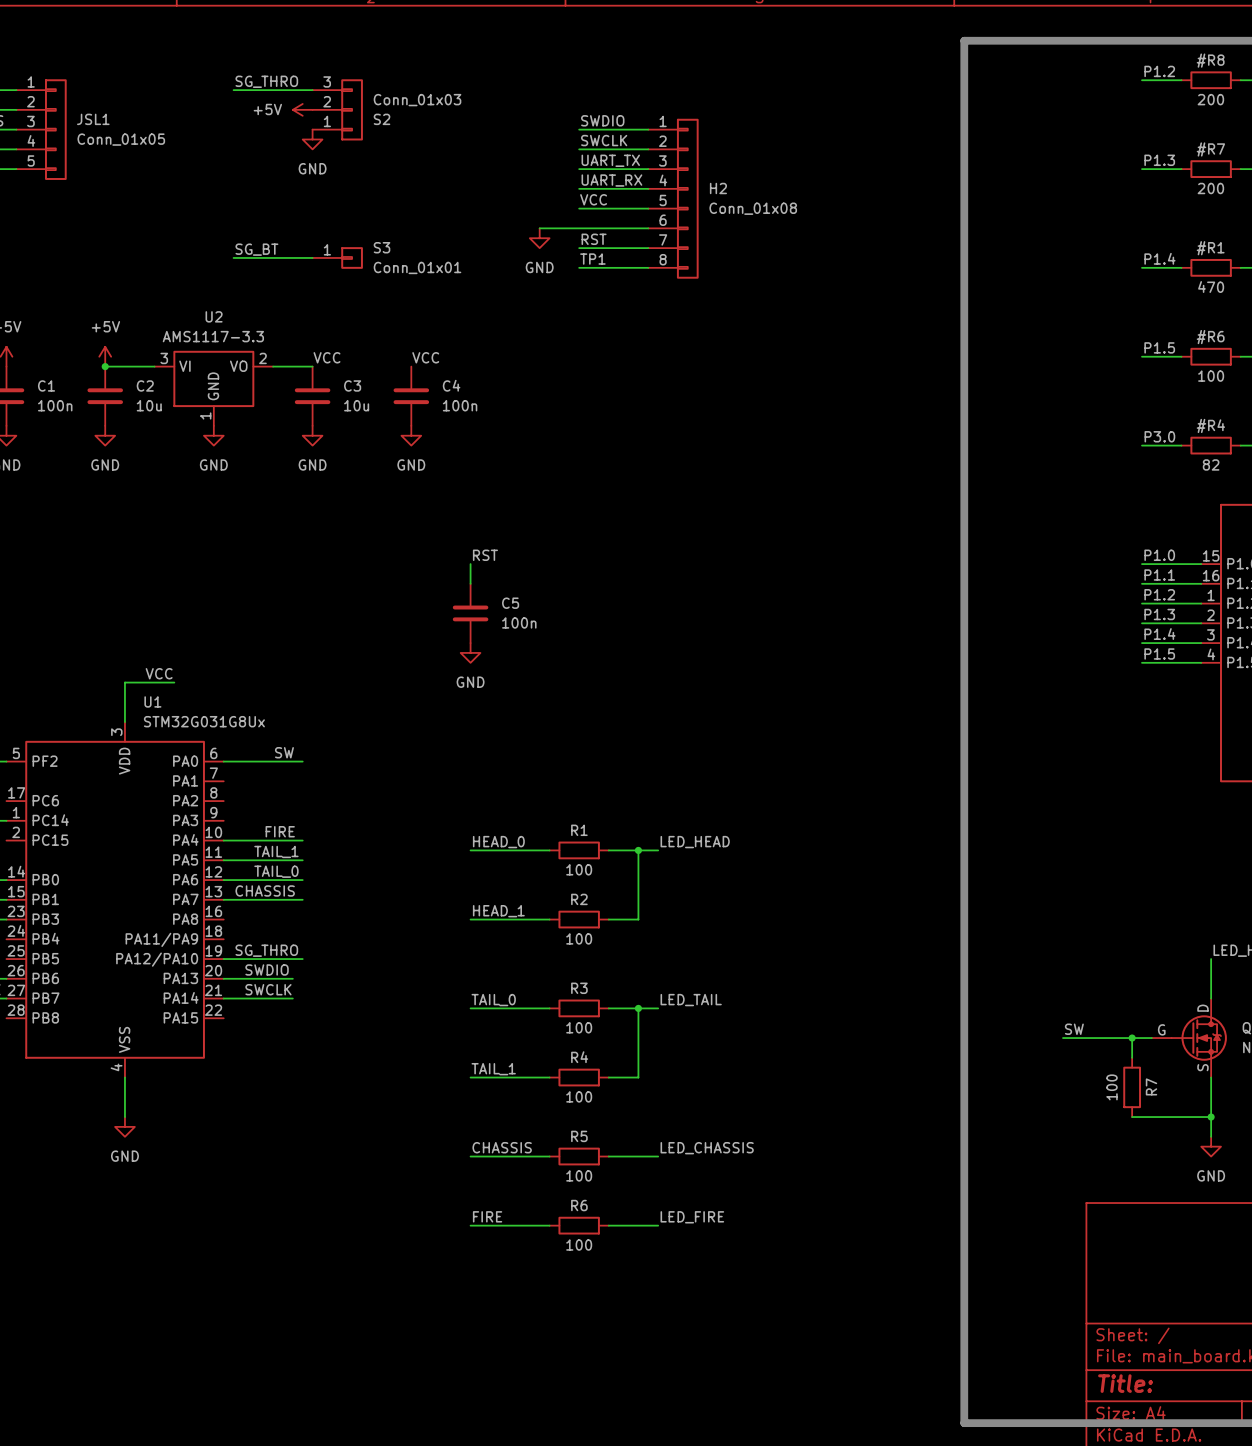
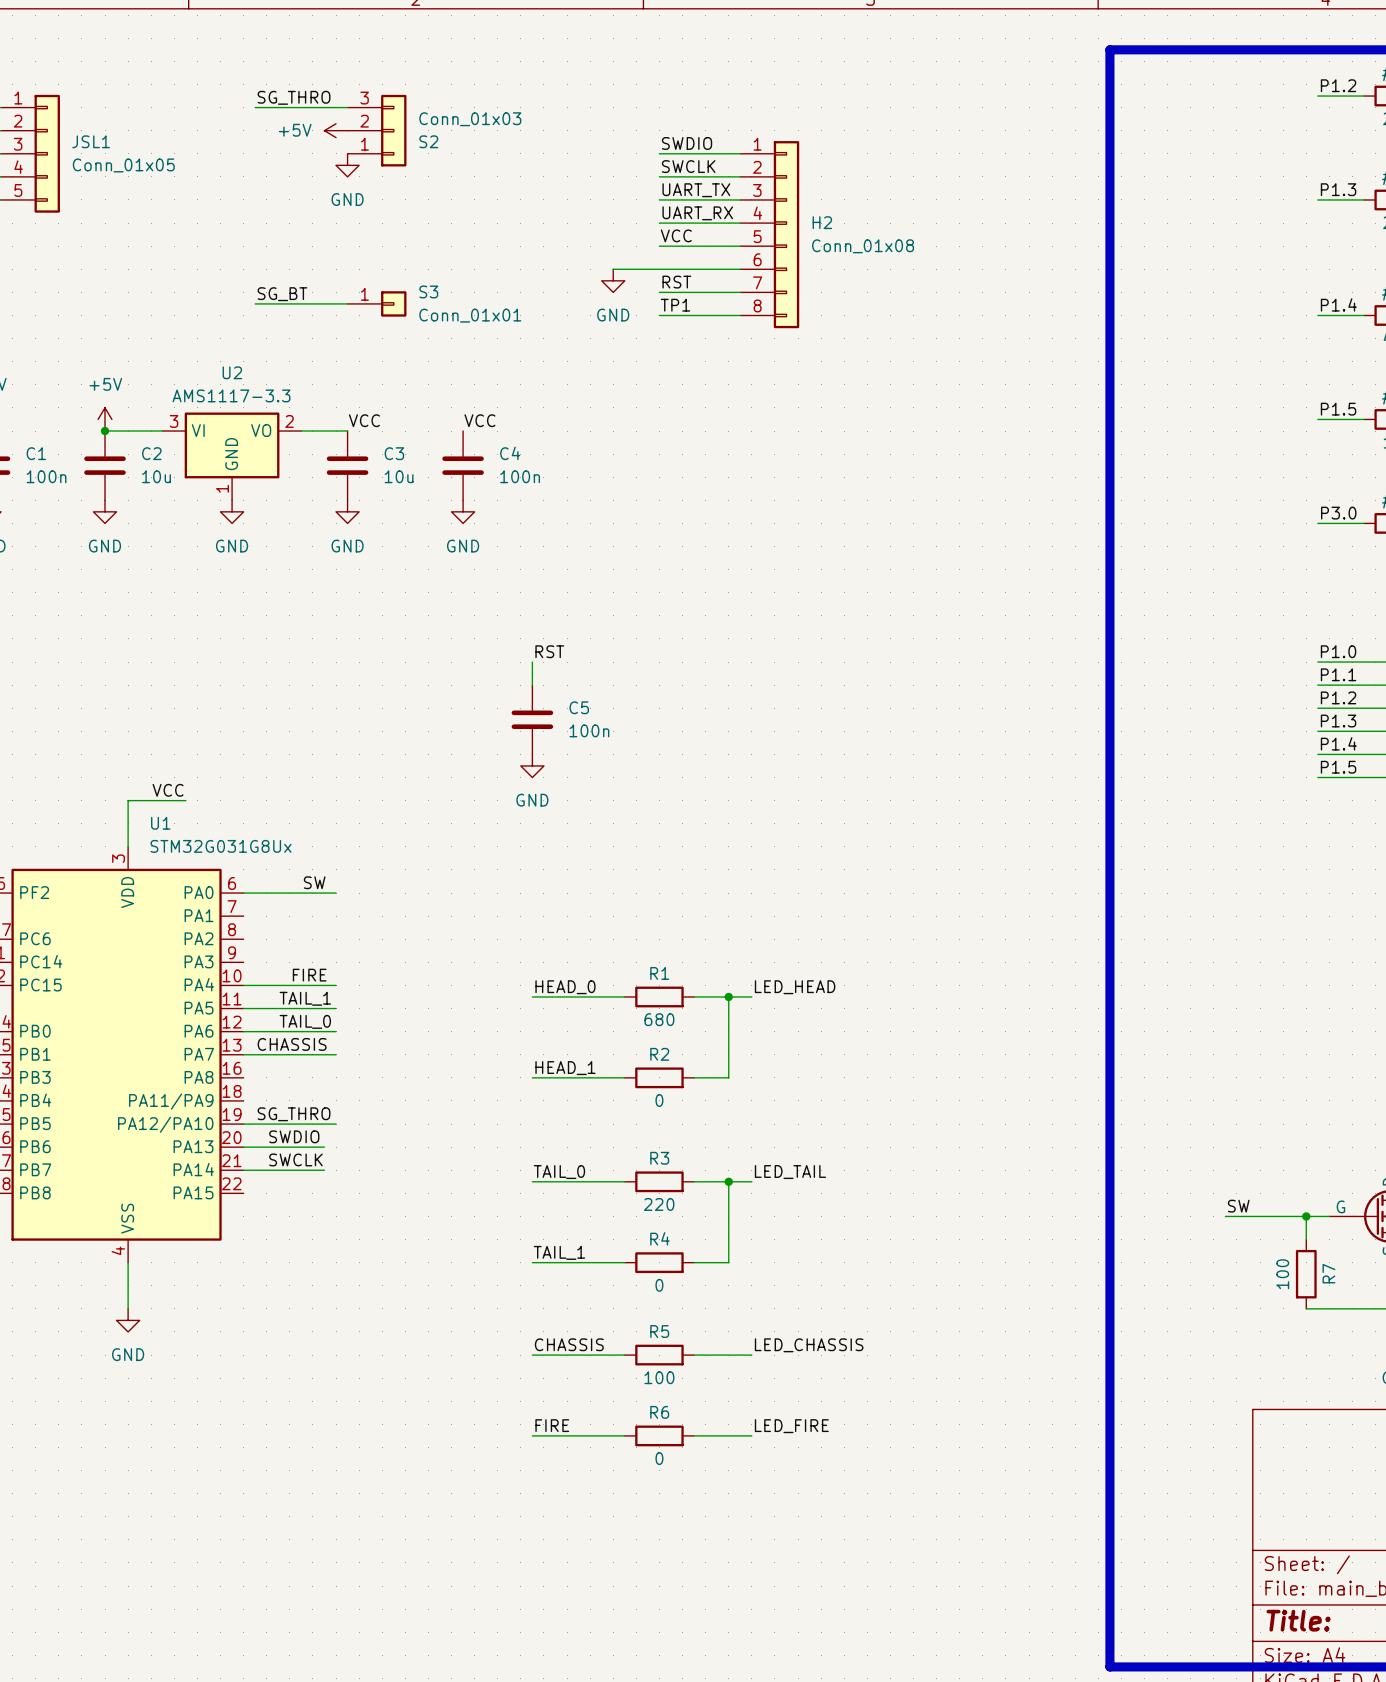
R1 value: 100 (579, 869) -> 680 (659, 1019)
R2 value: 100 (579, 938) -> 0 (659, 1100)
R3 value: 100 (579, 1027) -> 220 (659, 1204)
R4 value: 100 (579, 1096) -> 0 (659, 1285)
R6 value: 100 (579, 1245) -> 0 (659, 1458)

